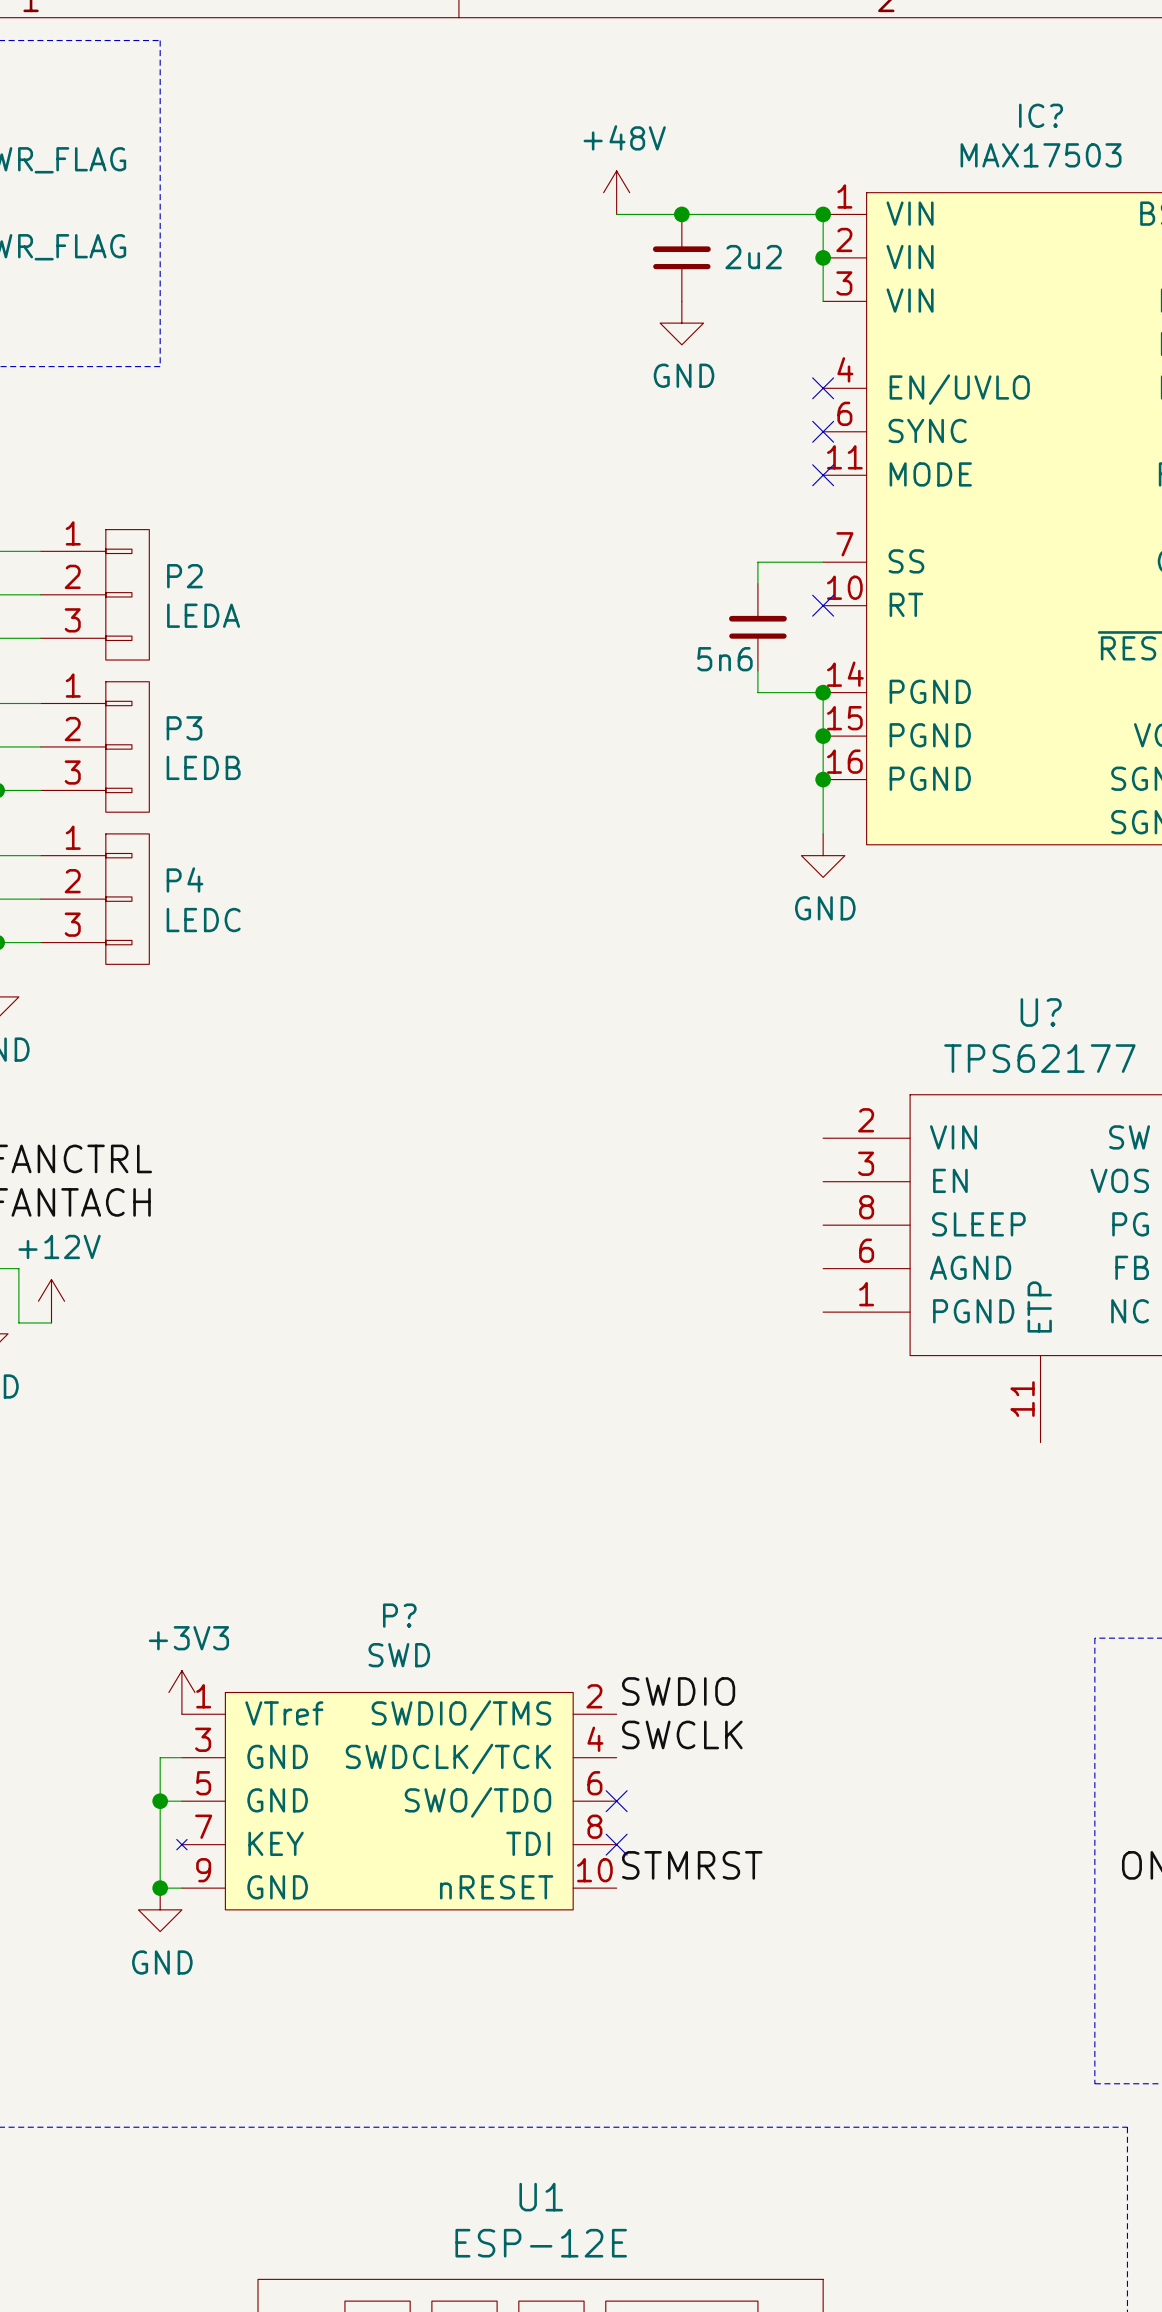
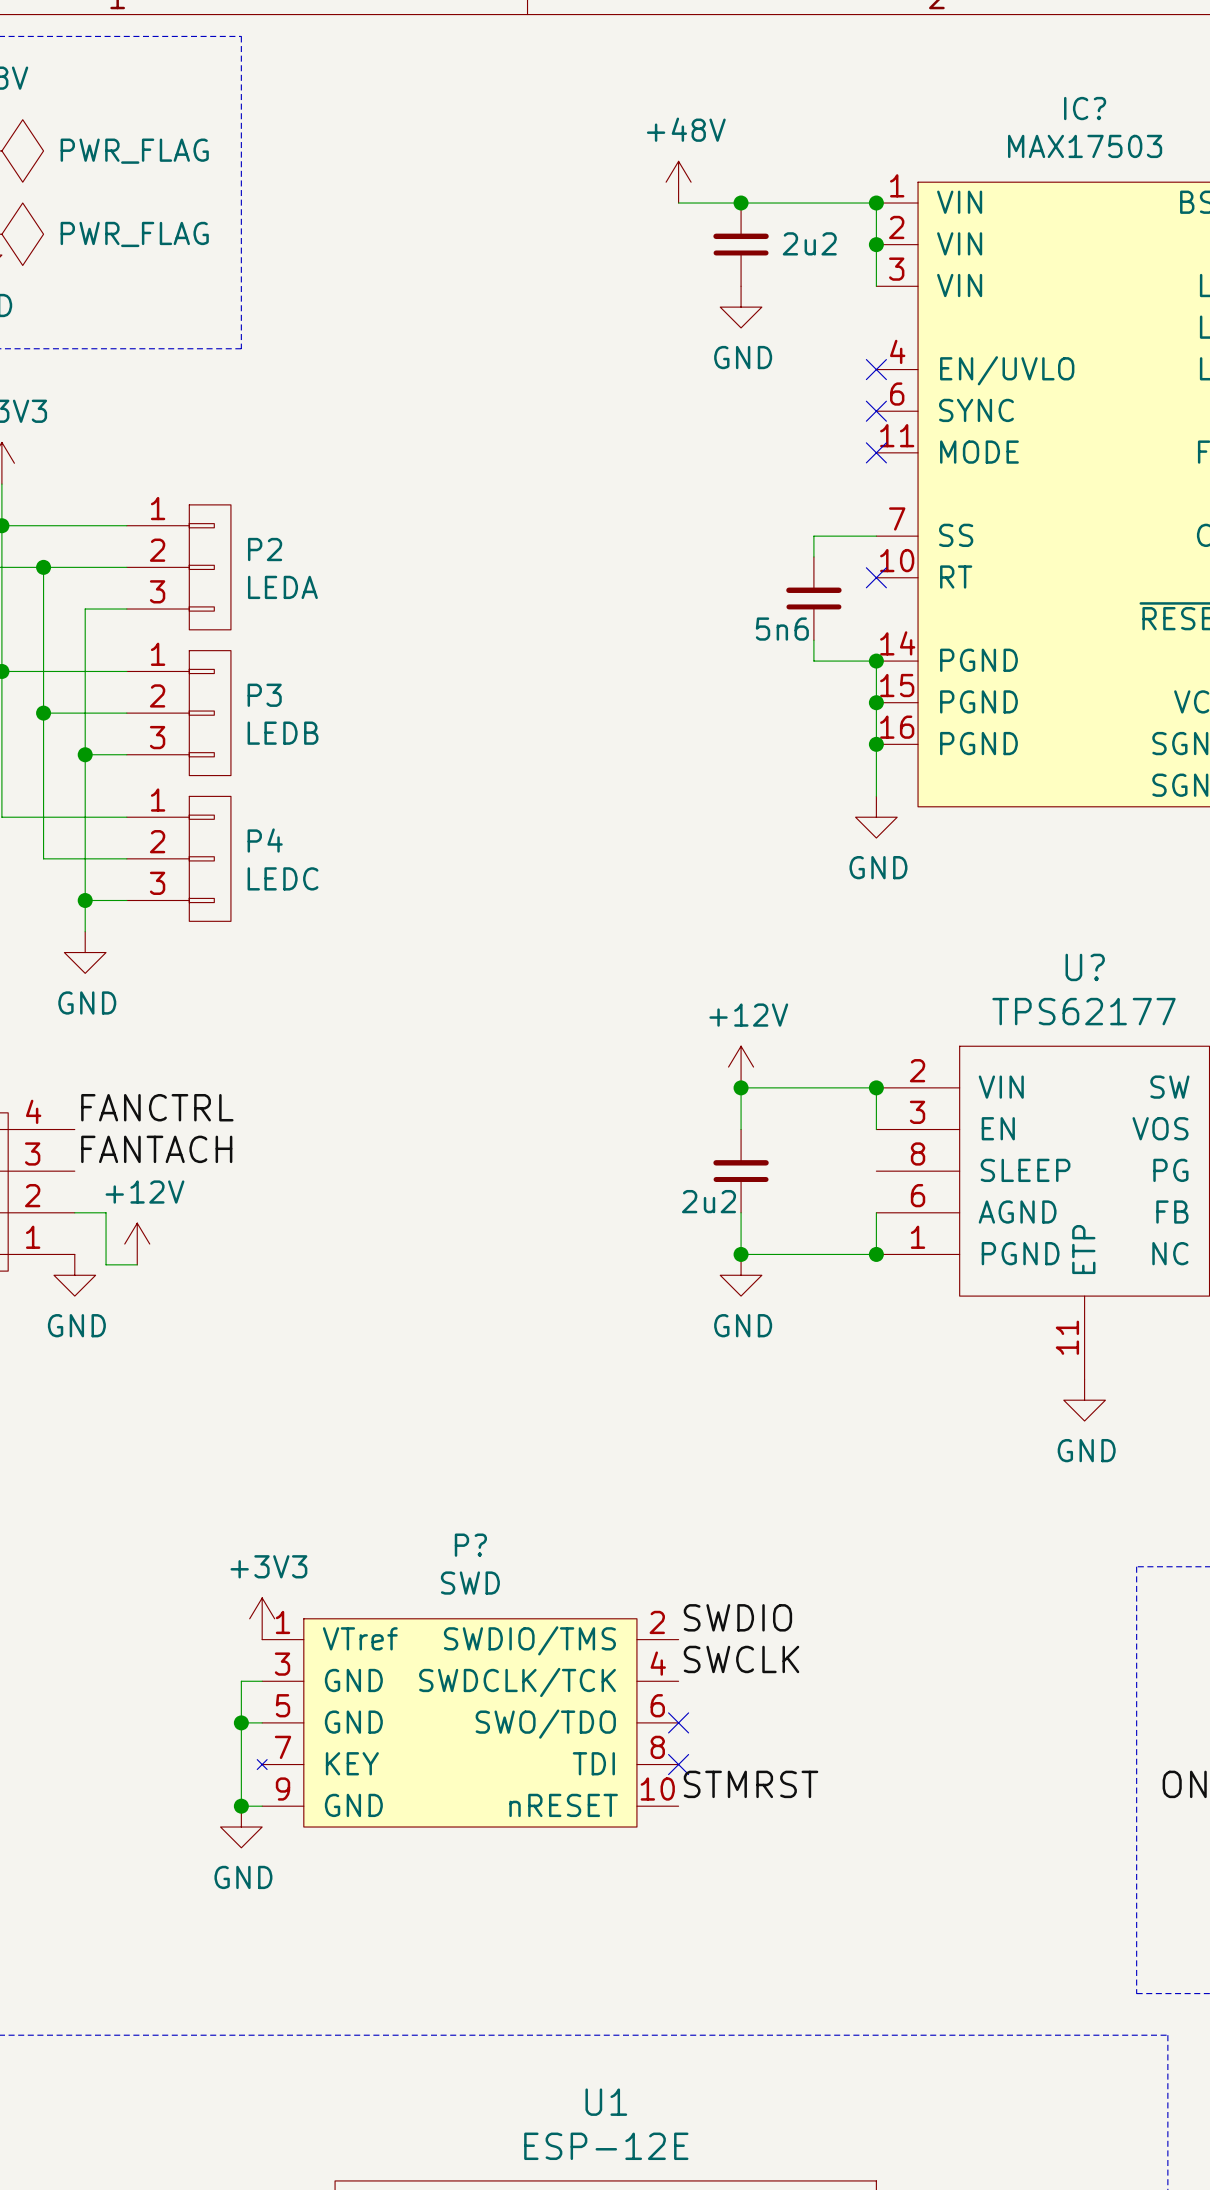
power symbol: none -> +12V (741, 1067)
junction: none -> (741, 1087)
junction: none -> (876, 1087)
wire: none -> (741, 1129) (741, 1087) (876, 1087) (876, 1129)
part: none -> 2u2 (741, 1171)
wire: none -> (741, 1212) (741, 1254) (876, 1254) (876, 1212)
junction: none -> (741, 1254)
junction: none -> (876, 1254)
power symbol: none -> GND (741, 1275)
power symbol: none -> GND (1084, 1400)

